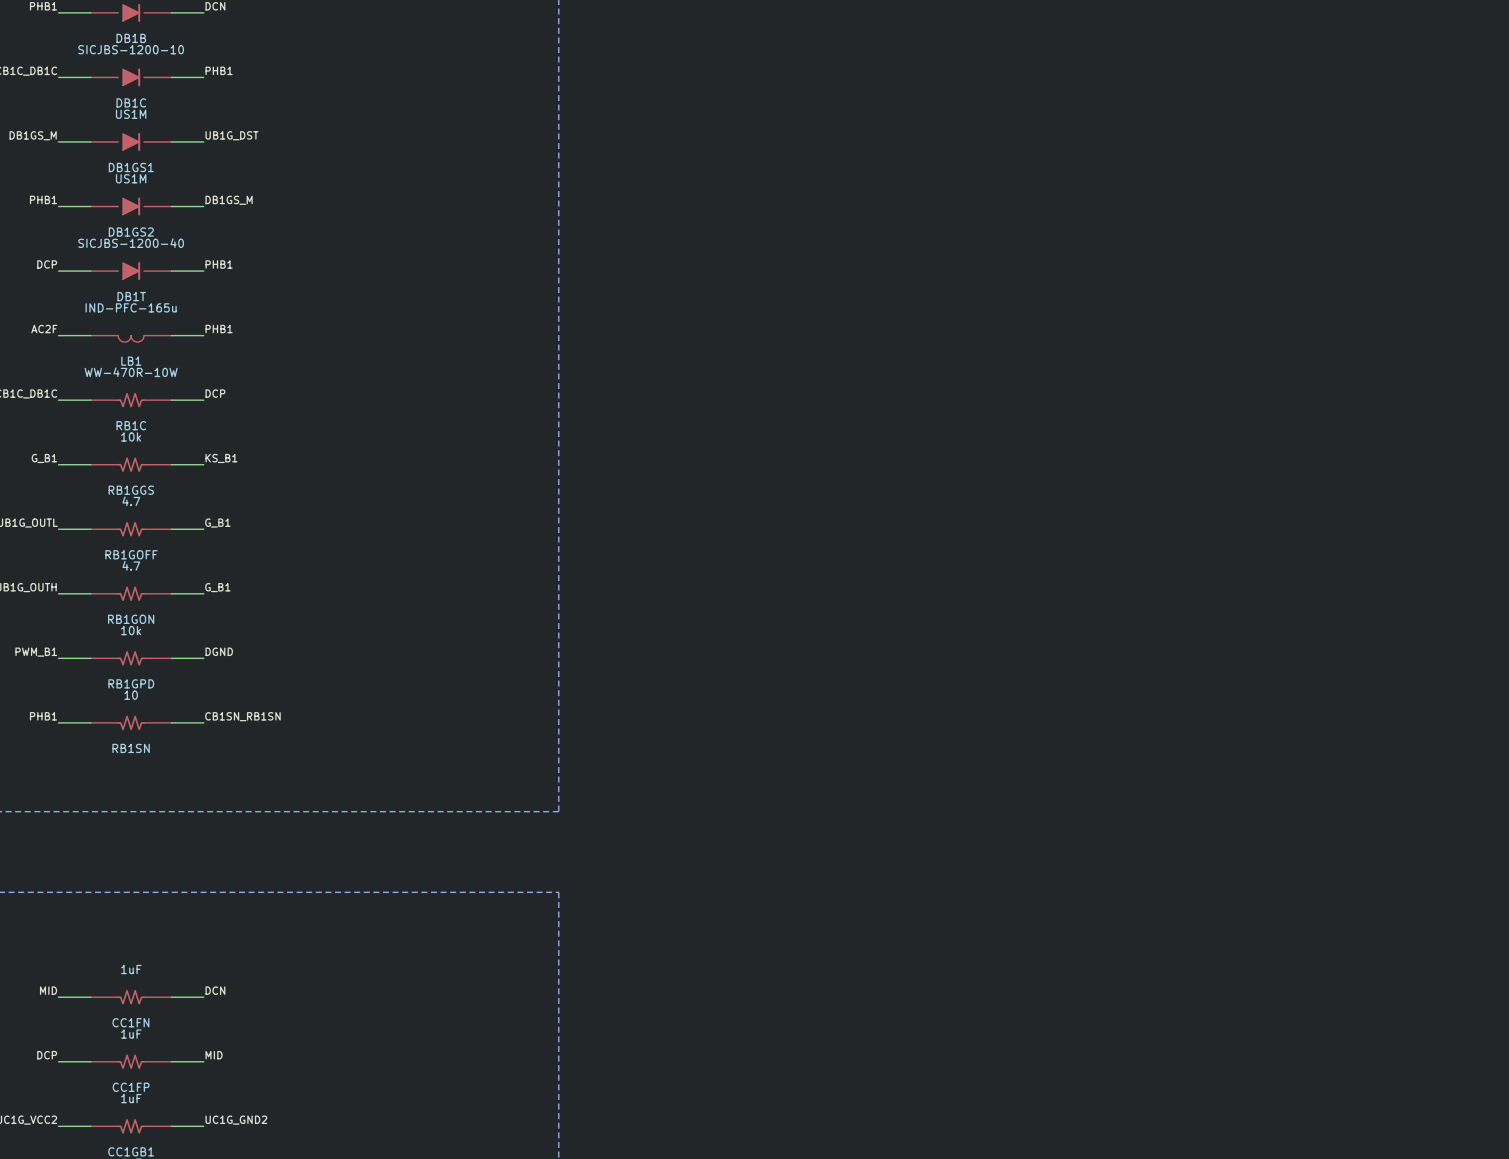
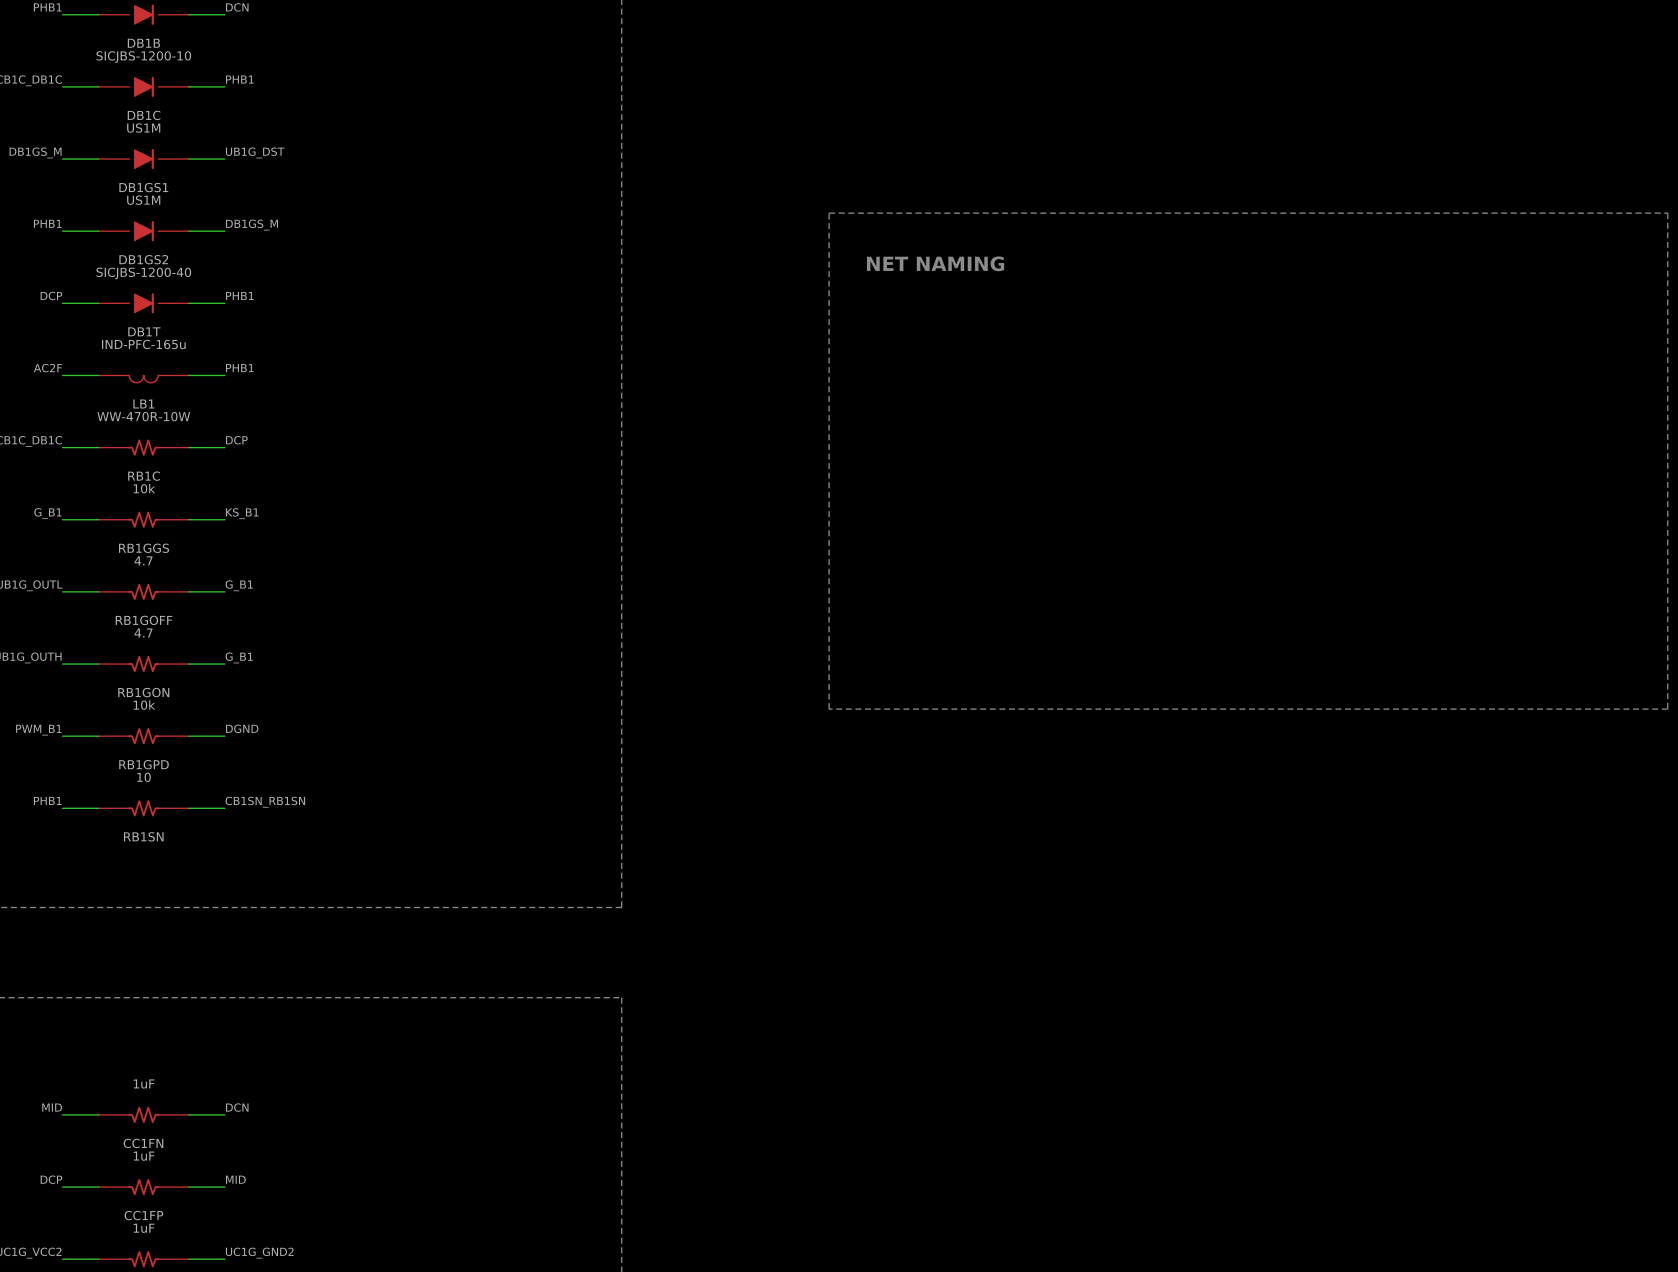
line: none -> (829, 213) (1667, 213) (1667, 709) (829, 709) (829, 213)
text: none -> NET NAMING (935, 263)

